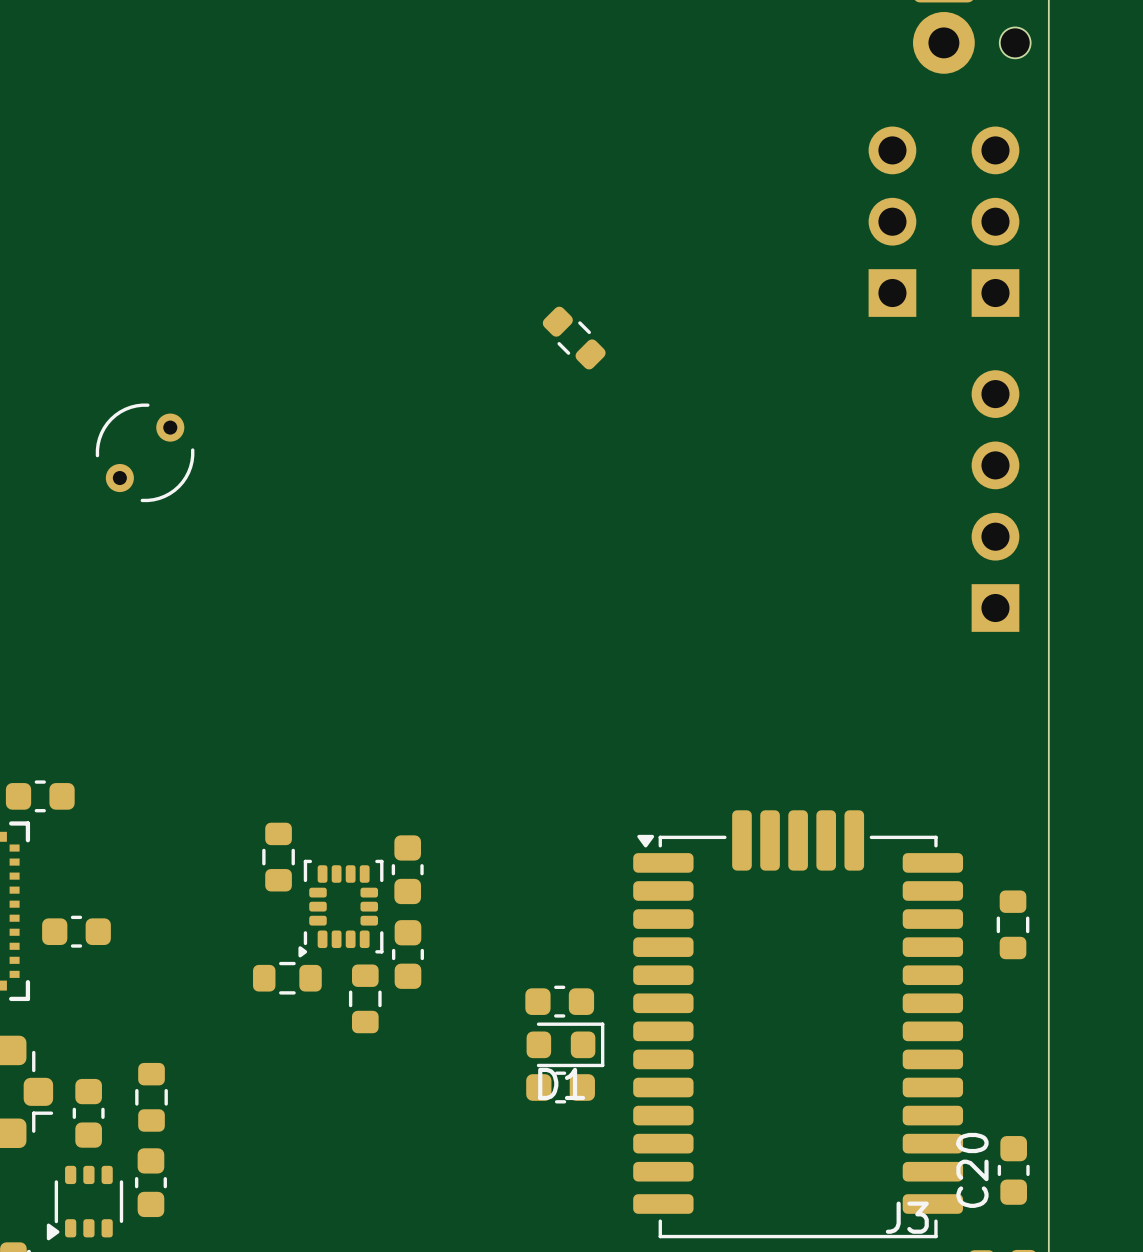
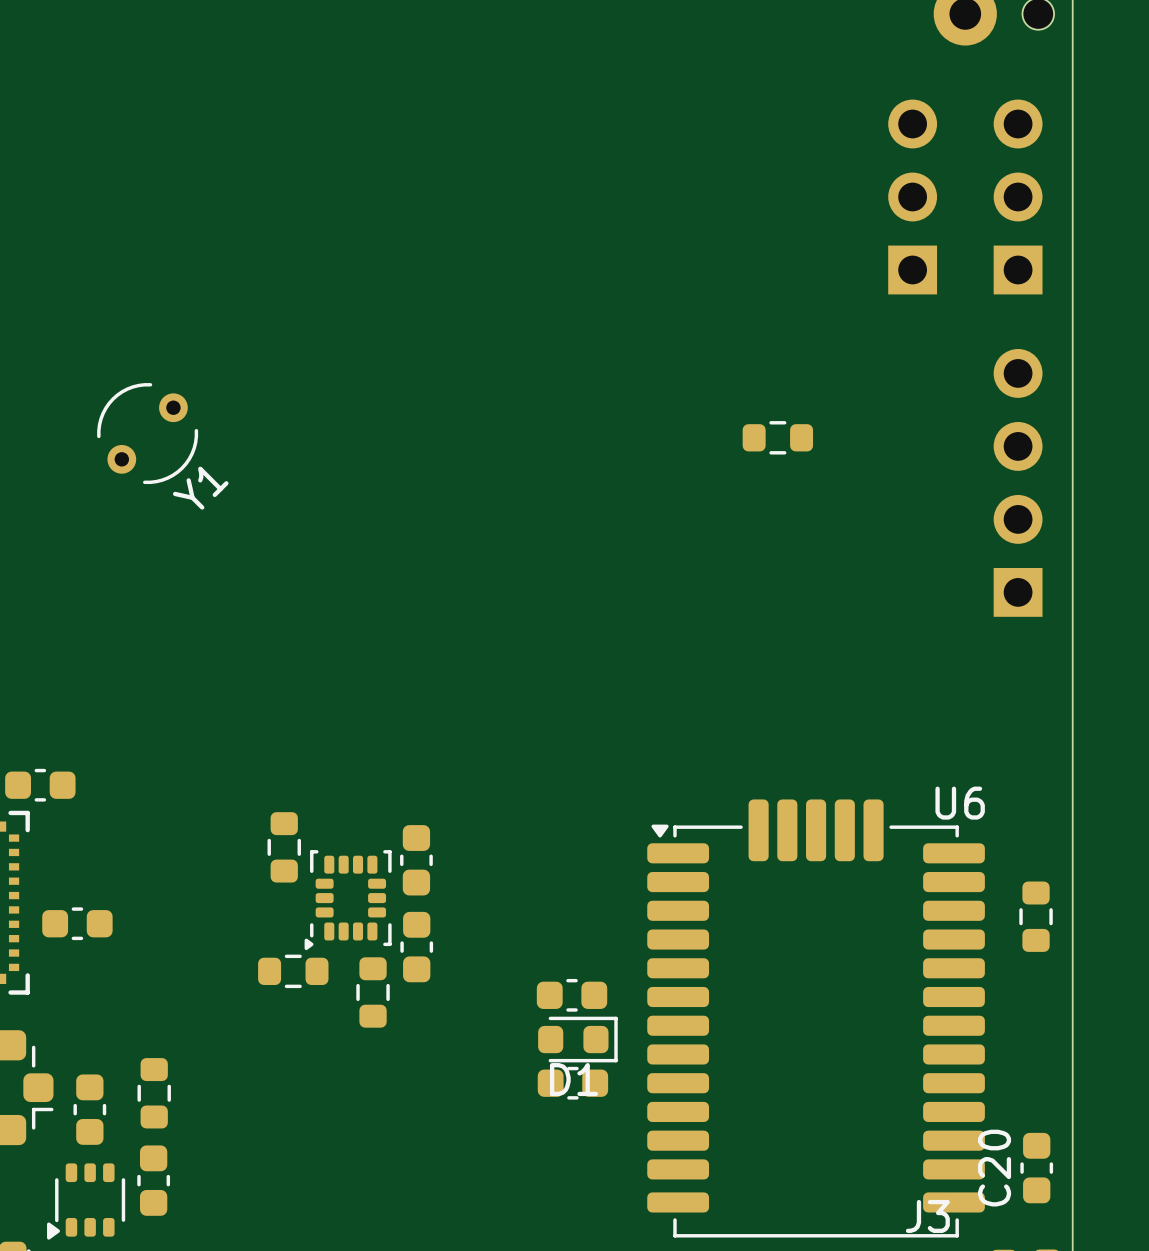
part: (574, 338) -> none
part: none -> (777, 437)
Y1 name: none -> Y1 (200, 488)
U6 name: none -> U6 (960, 803)

